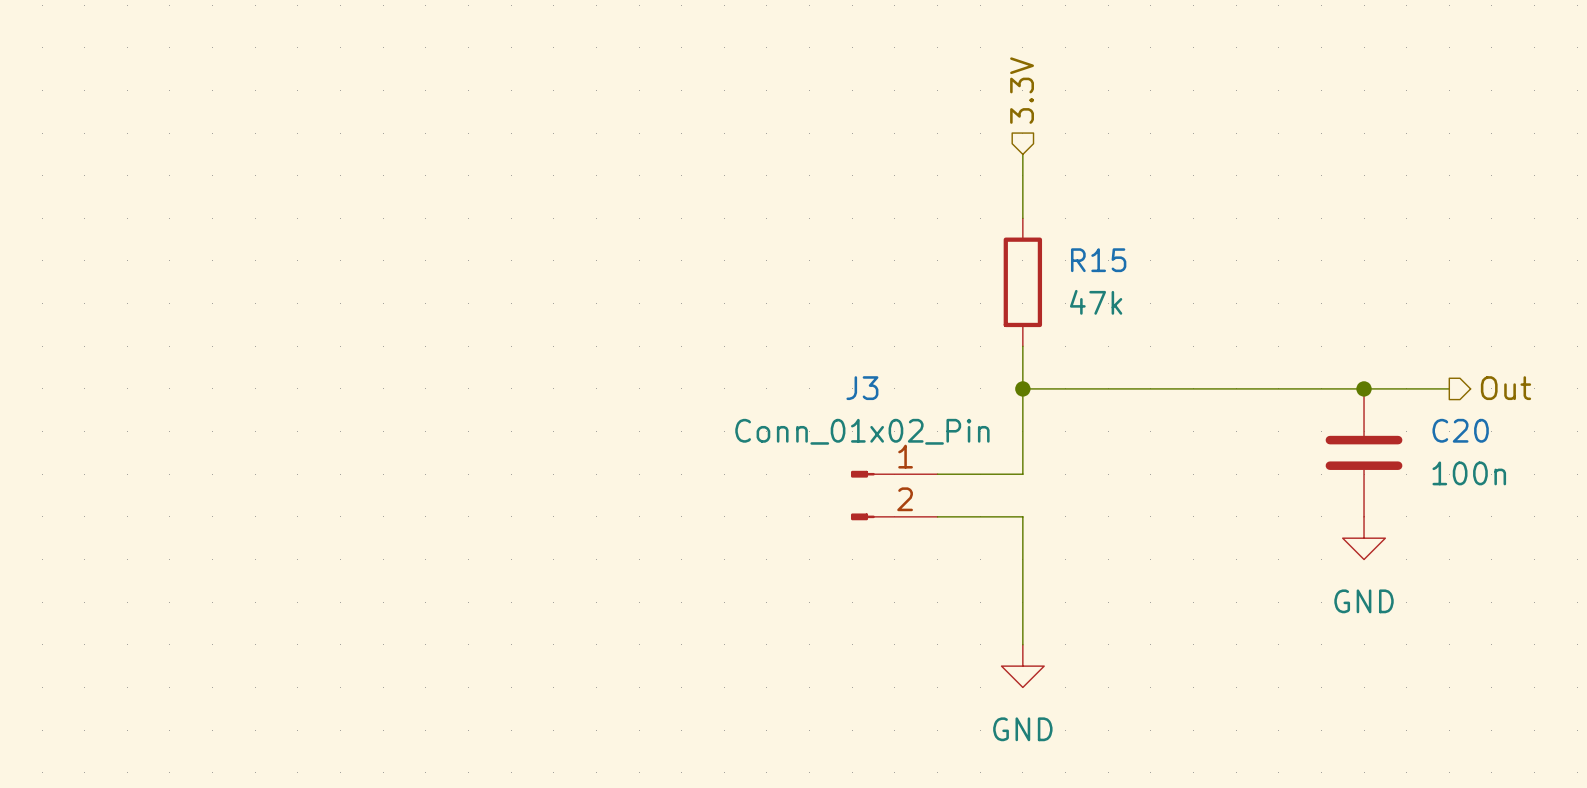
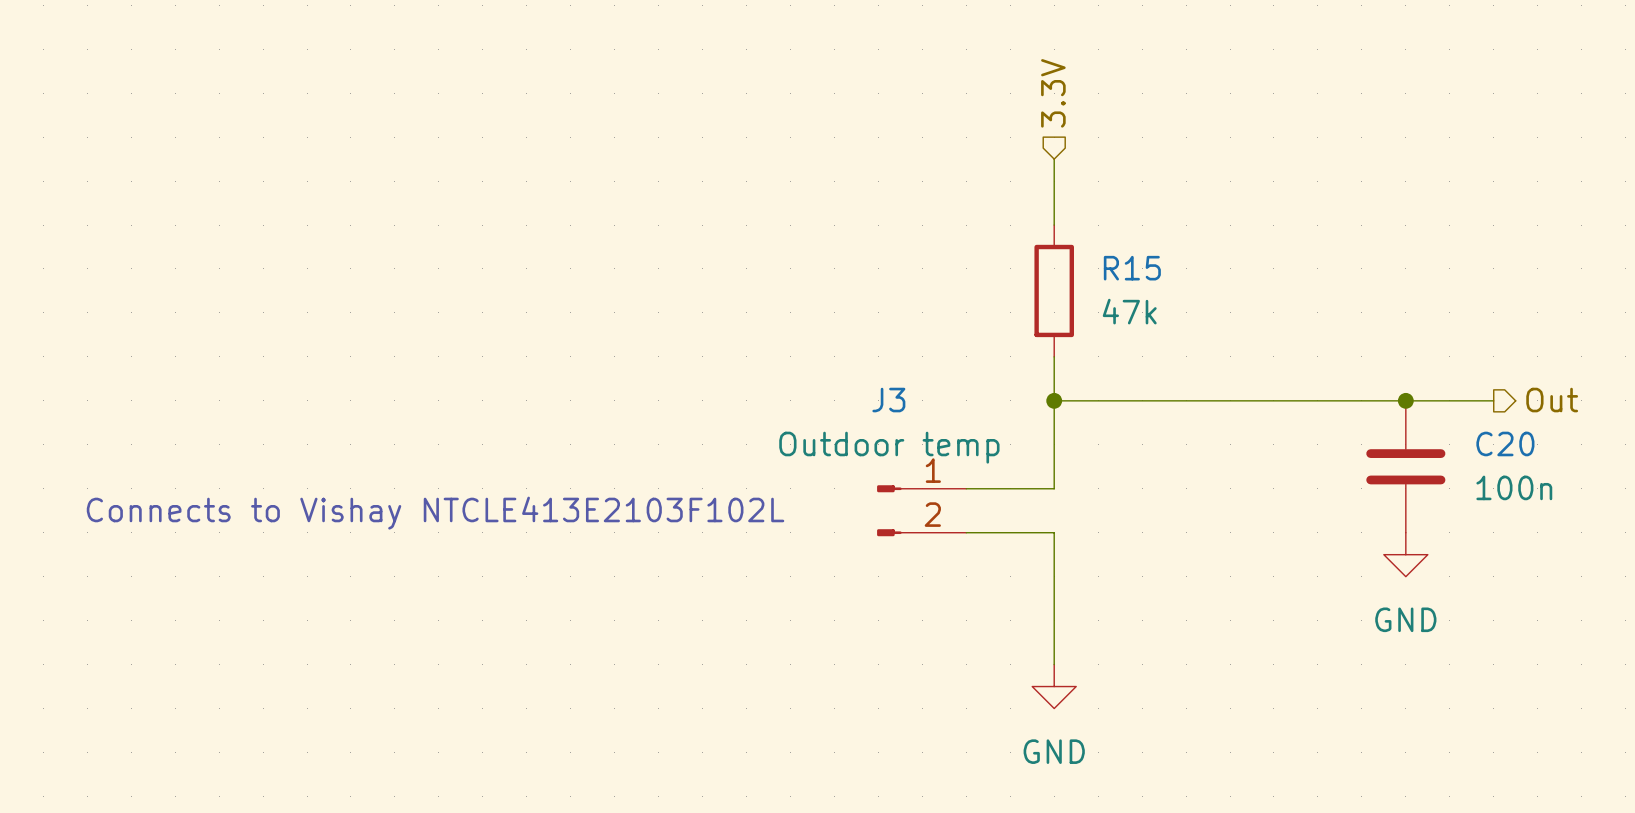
J3 value: Conn_01x02_Pin (862, 431) -> Outdoor temp (889, 447)
text: none -> Connects to Vishay NTCLE413E2103F102L (435, 513)

